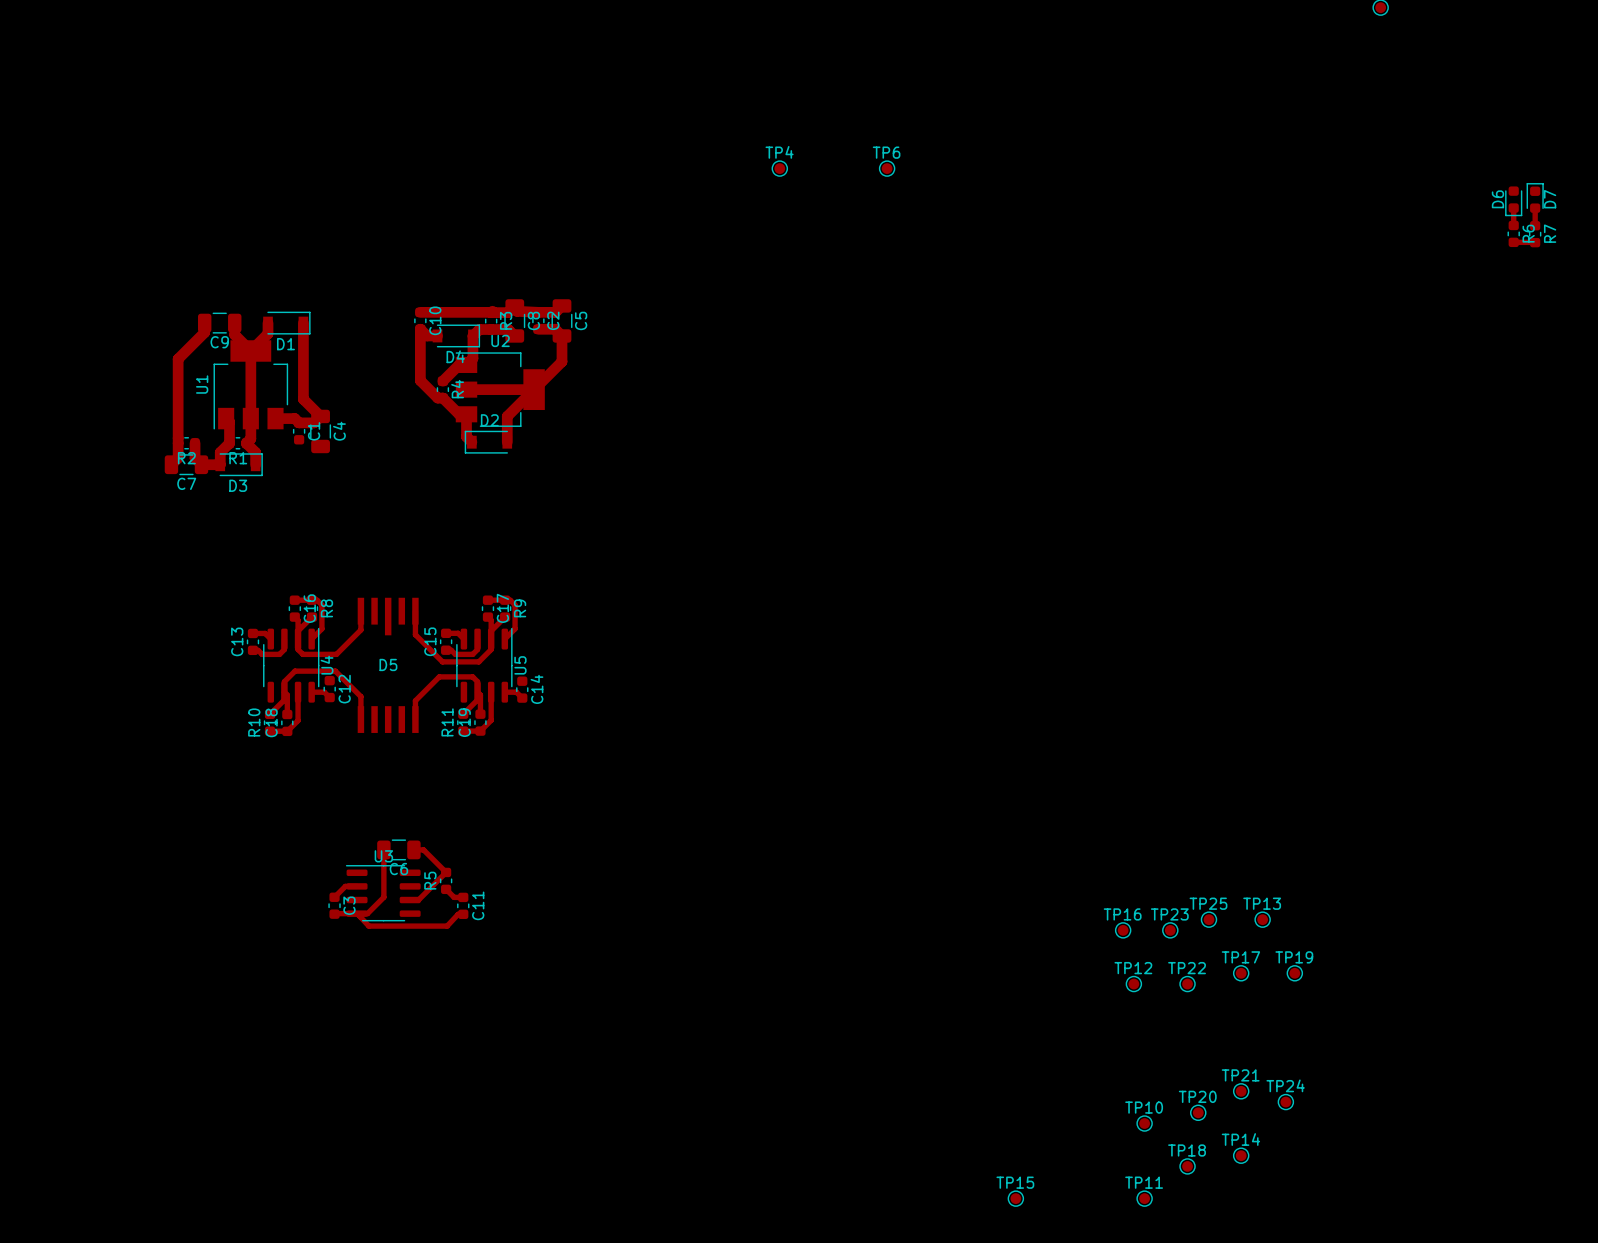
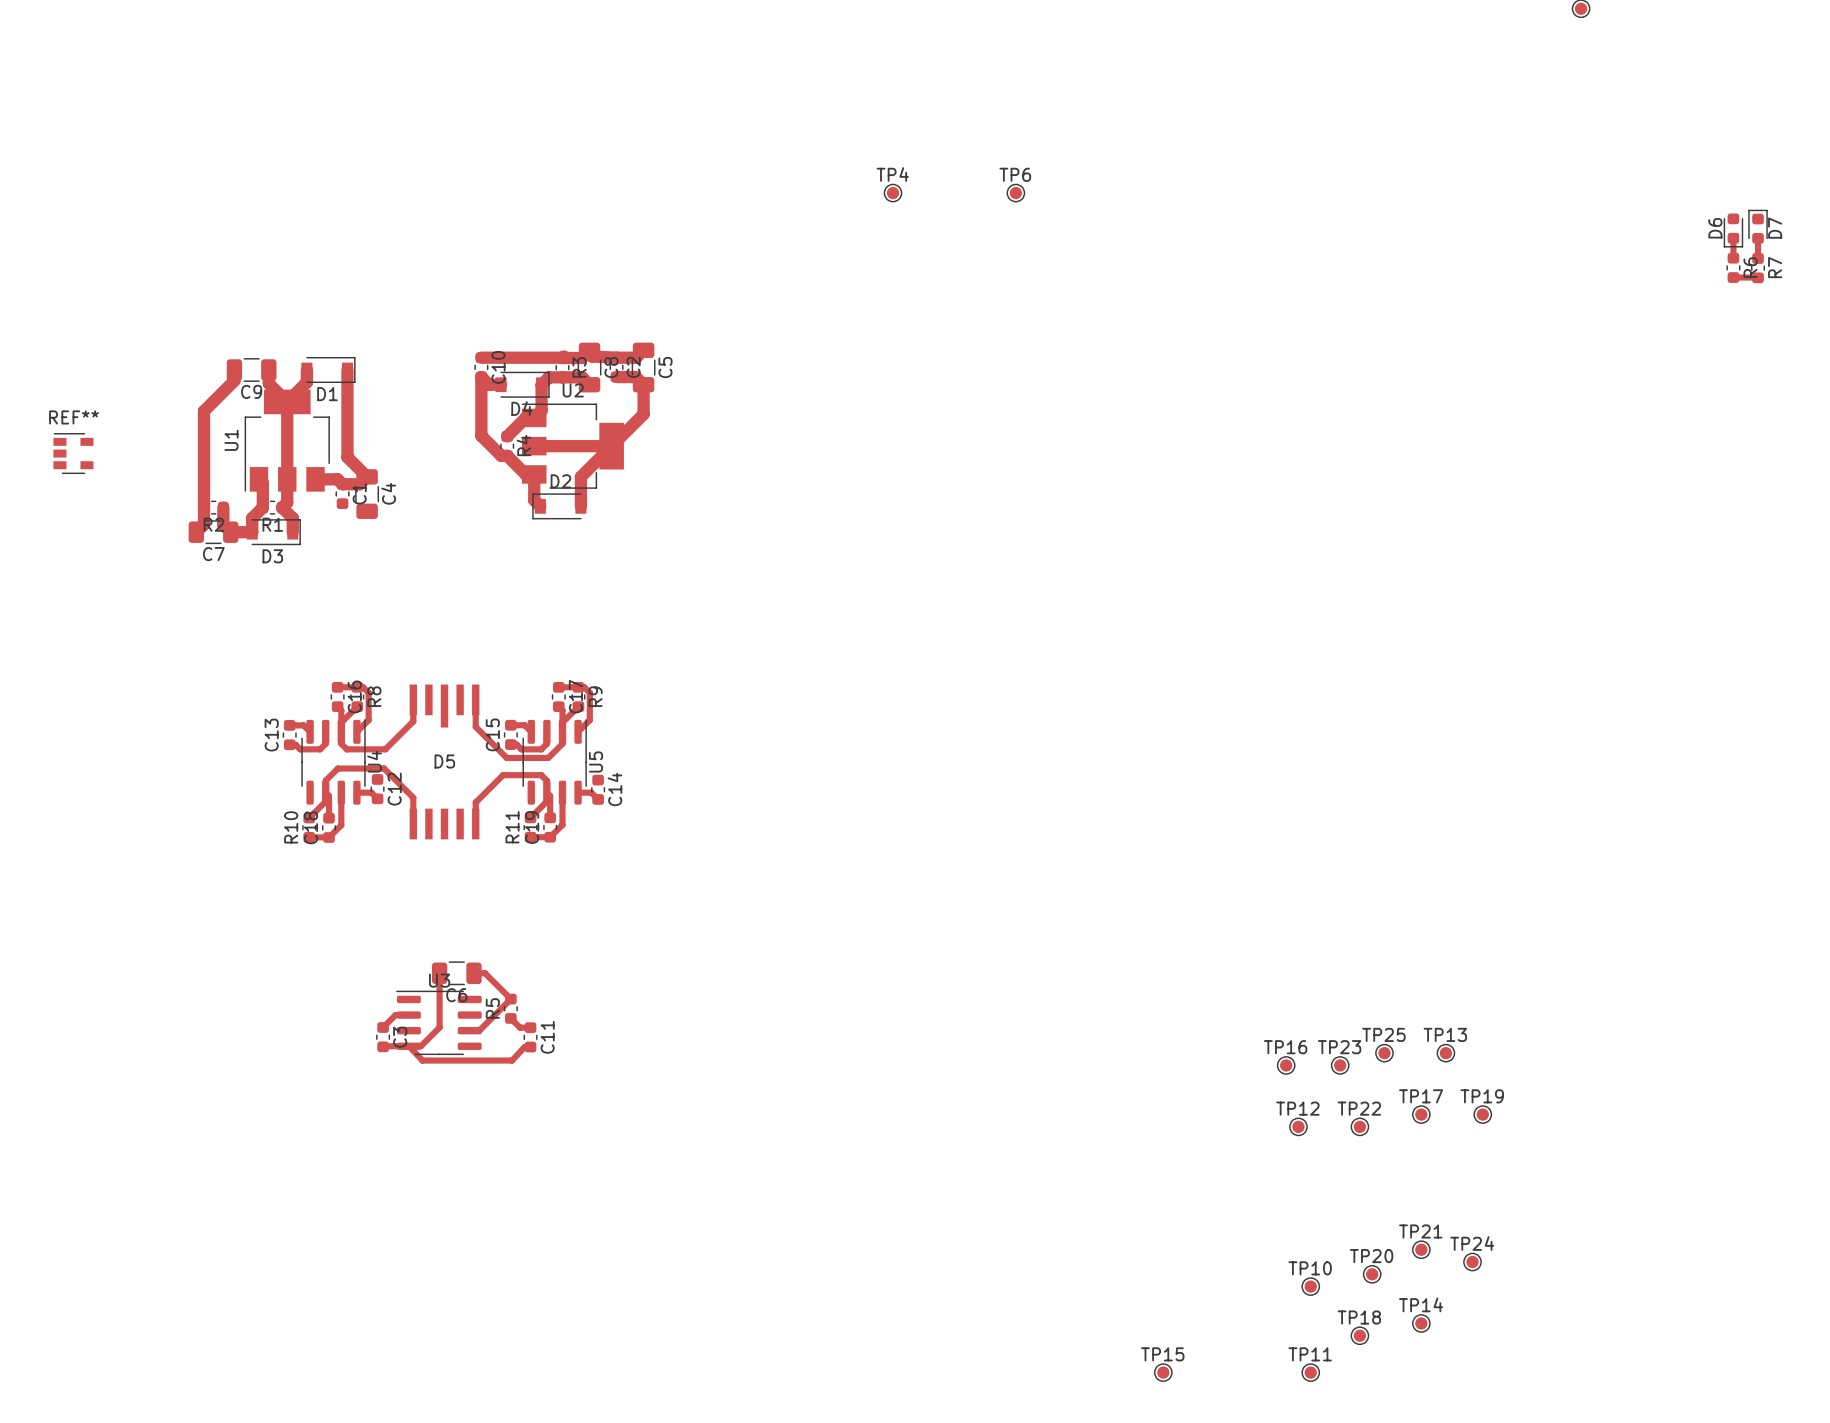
REF**: none -> (73, 453)

